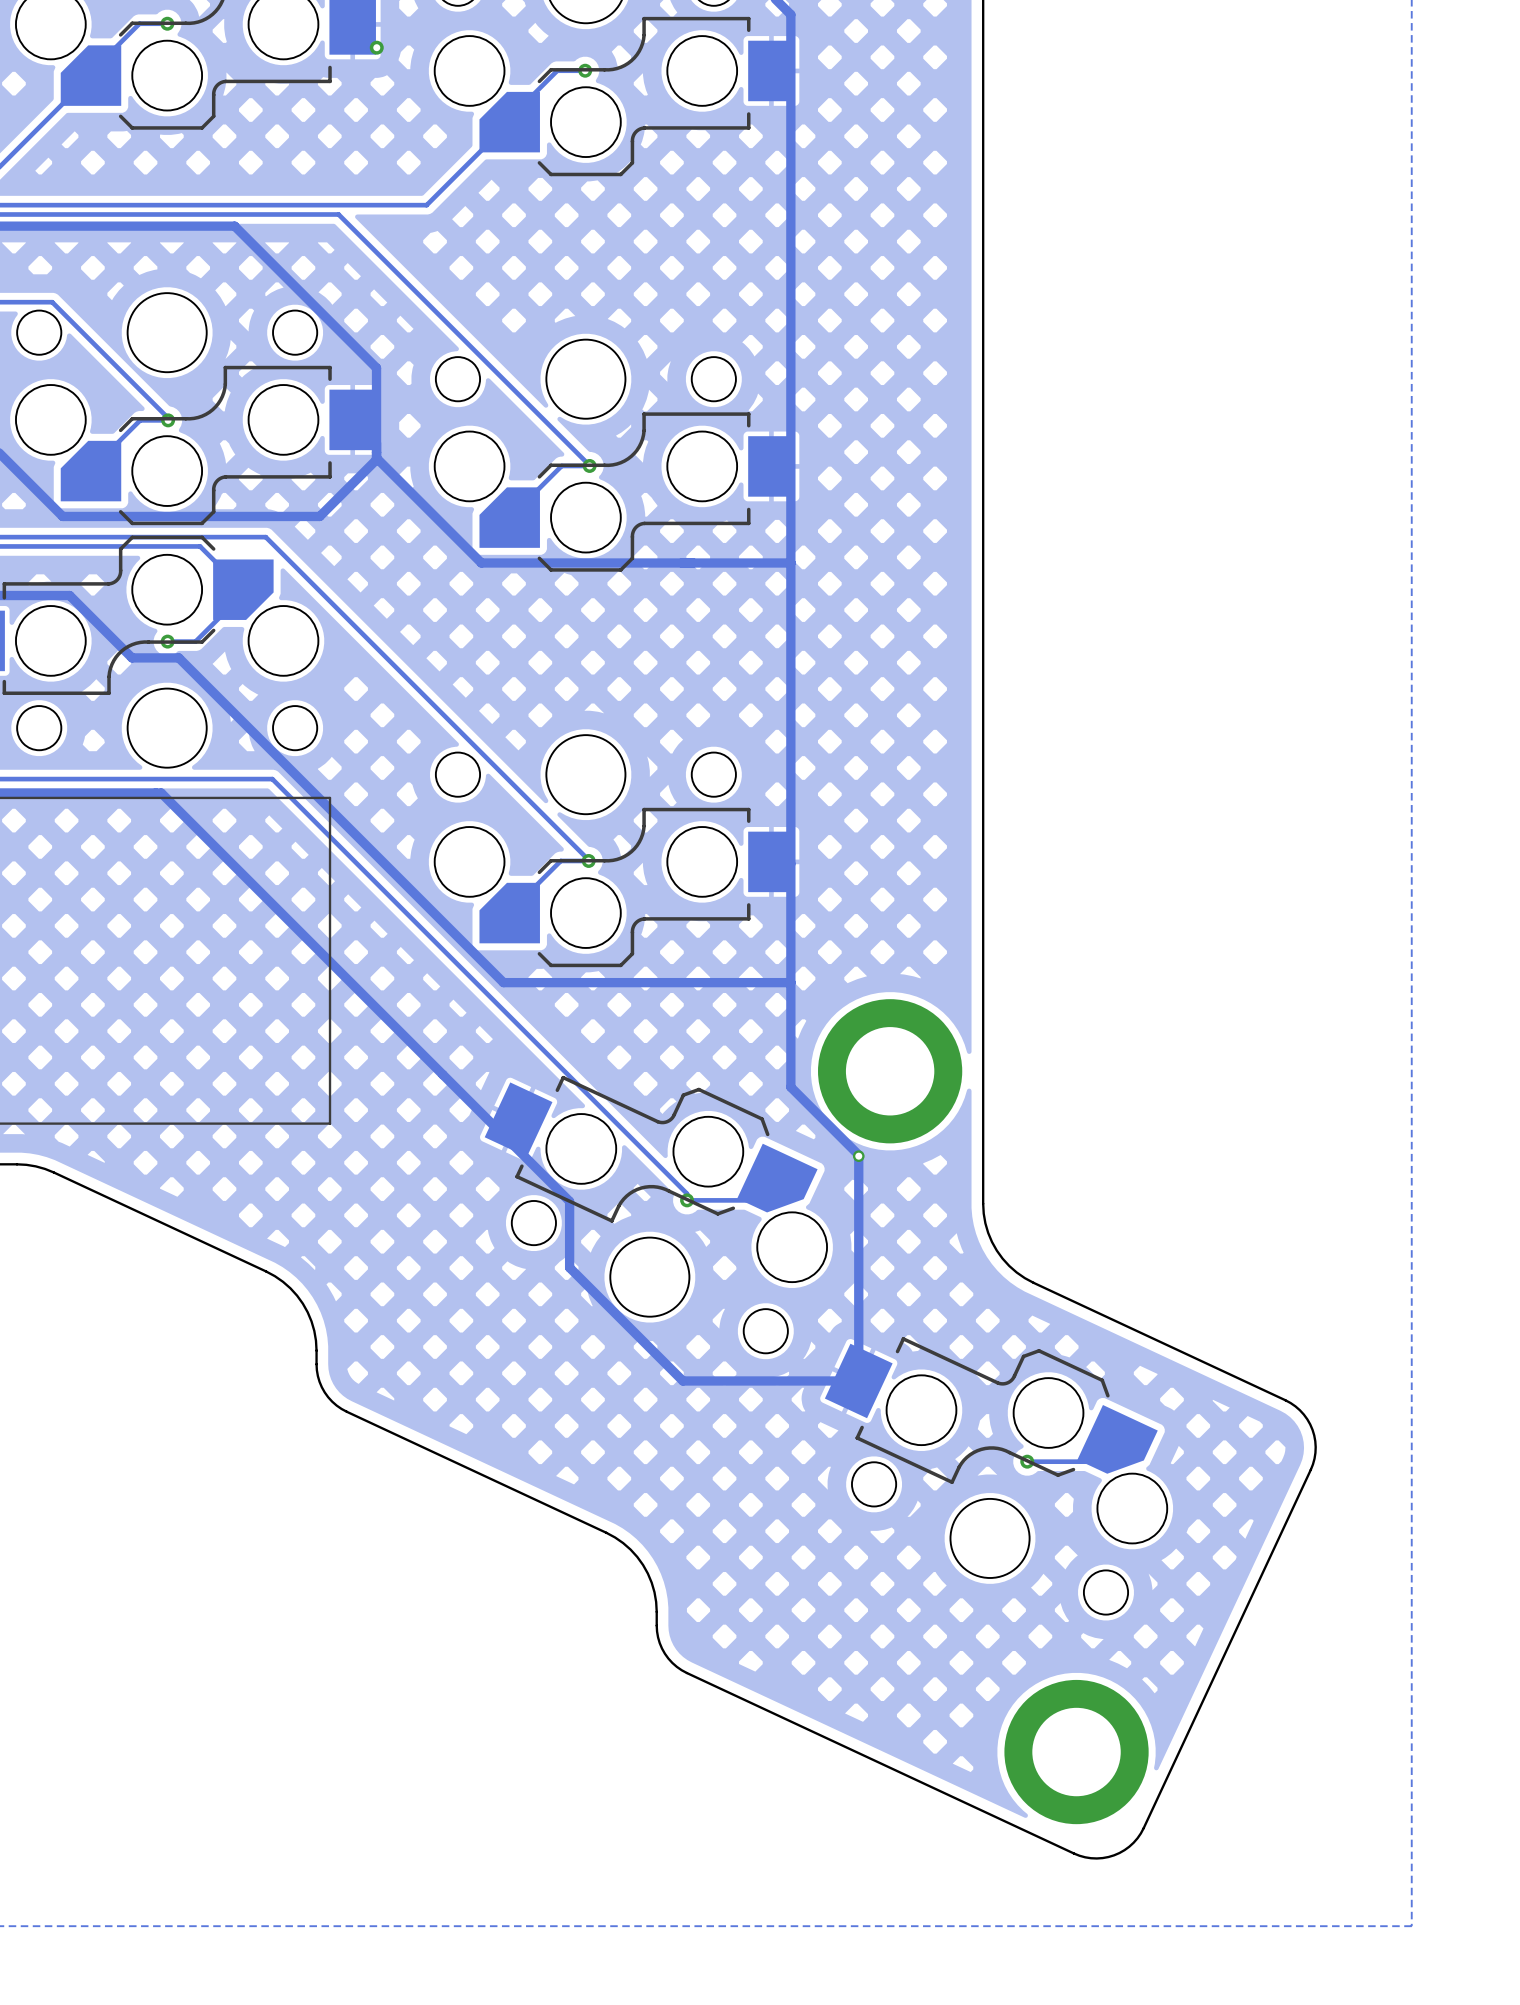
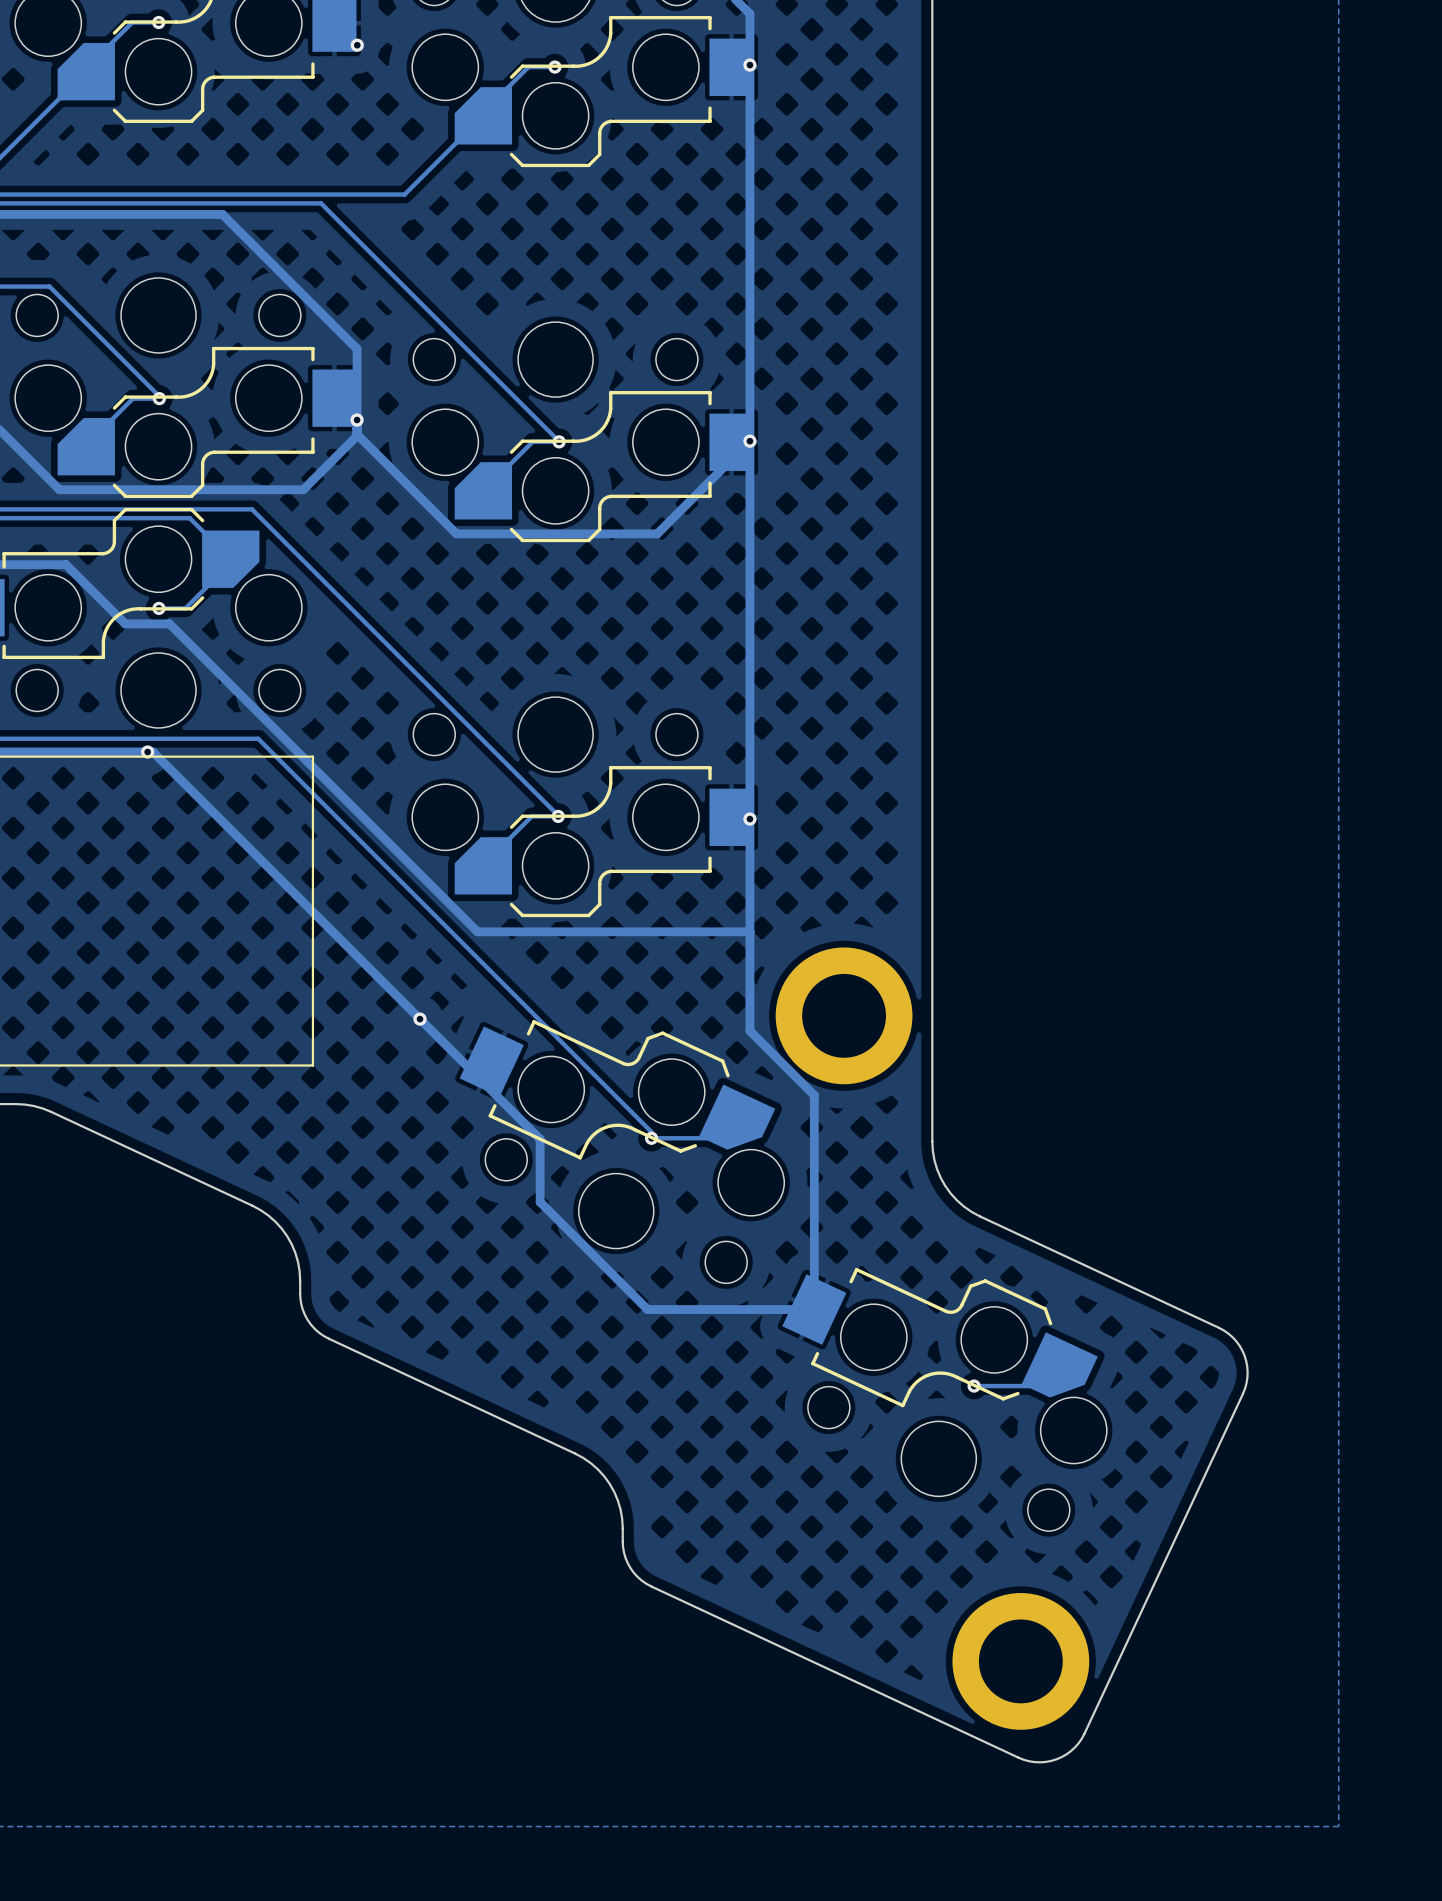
via: none -> (749, 65)
via: none -> (357, 420)
via: none -> (749, 441)
track: (790, 562) (693, 562) -> (749, 441) (657, 533)
via: none -> (147, 752)
via: none -> (749, 819)
via: none -> (419, 1019)
via: (858, 1156) -> none

